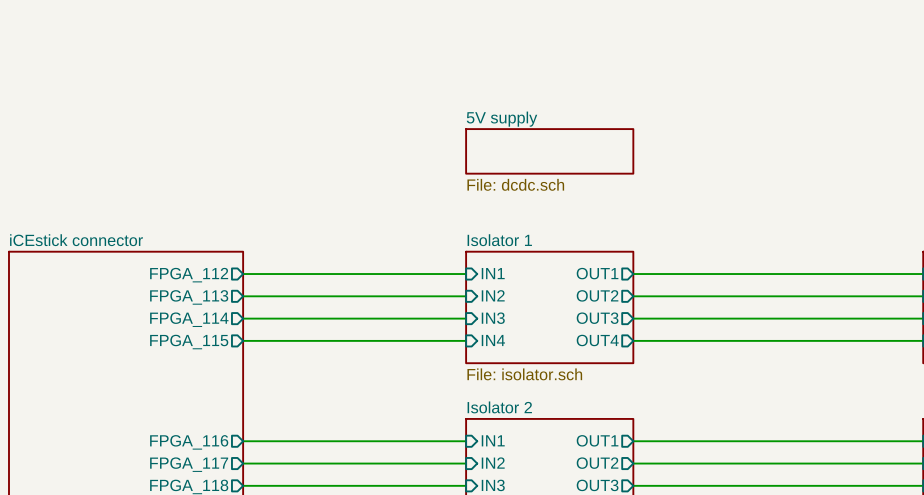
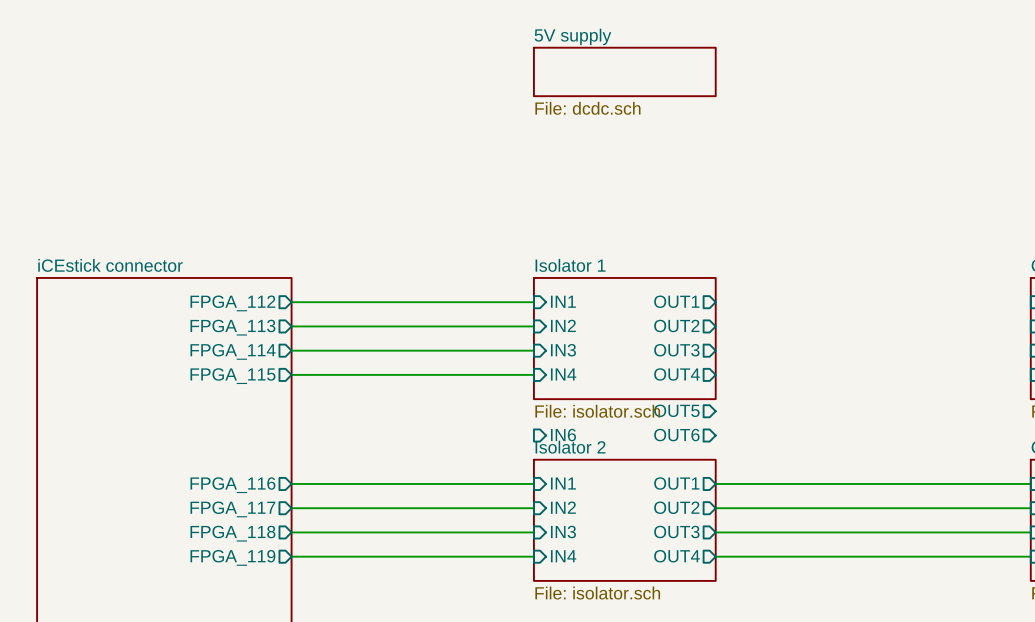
sheet 5V supply position: (549, 151) -> (624, 71)
wire: (633, 274) (923, 274) -> none
wire: (633, 296) (923, 296) -> none
wire: (633, 318) (923, 318) -> none
wire: (633, 340) (923, 340) -> none
sheet pin: none -> OUT5 (676, 410)
sheet pin: none -> IN6 (563, 435)
sheet pin: none -> OUT6 (676, 435)

